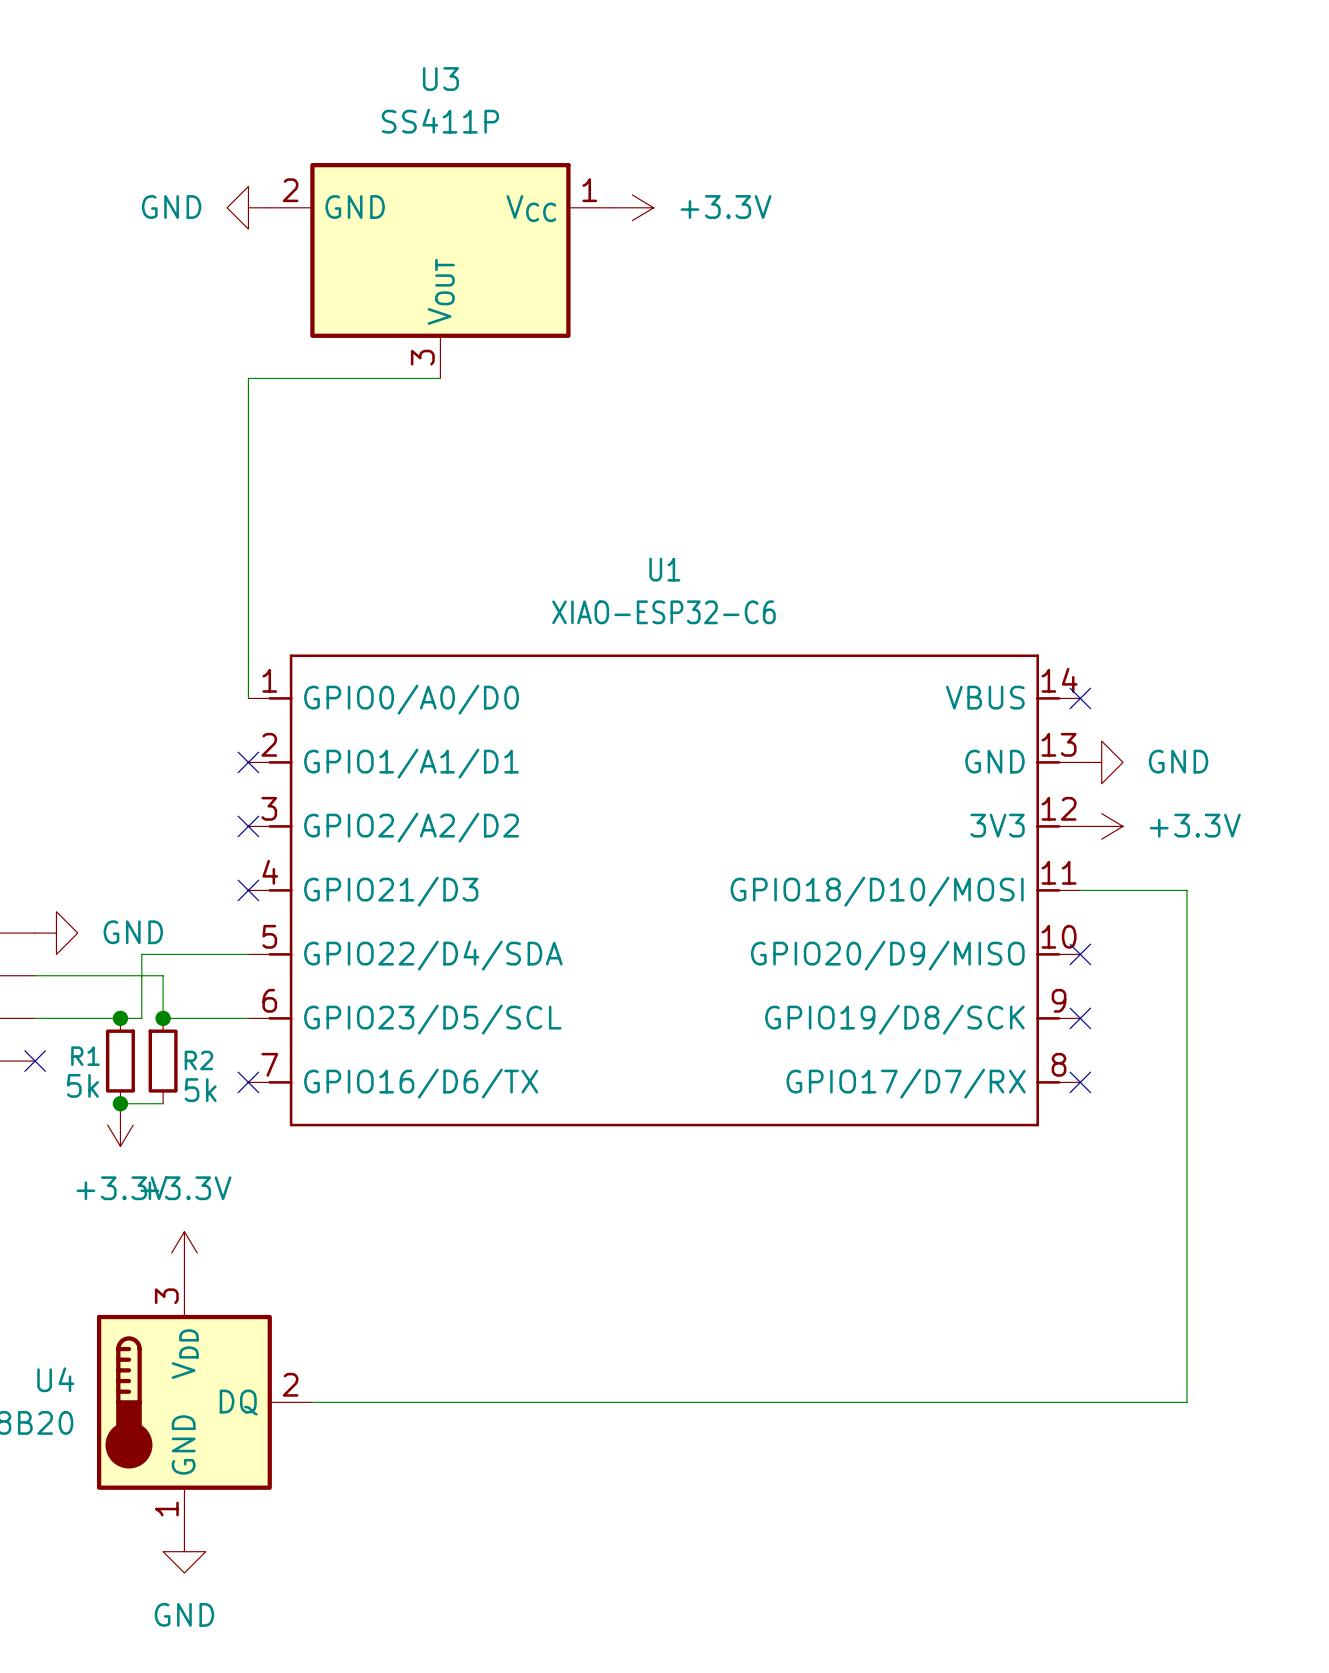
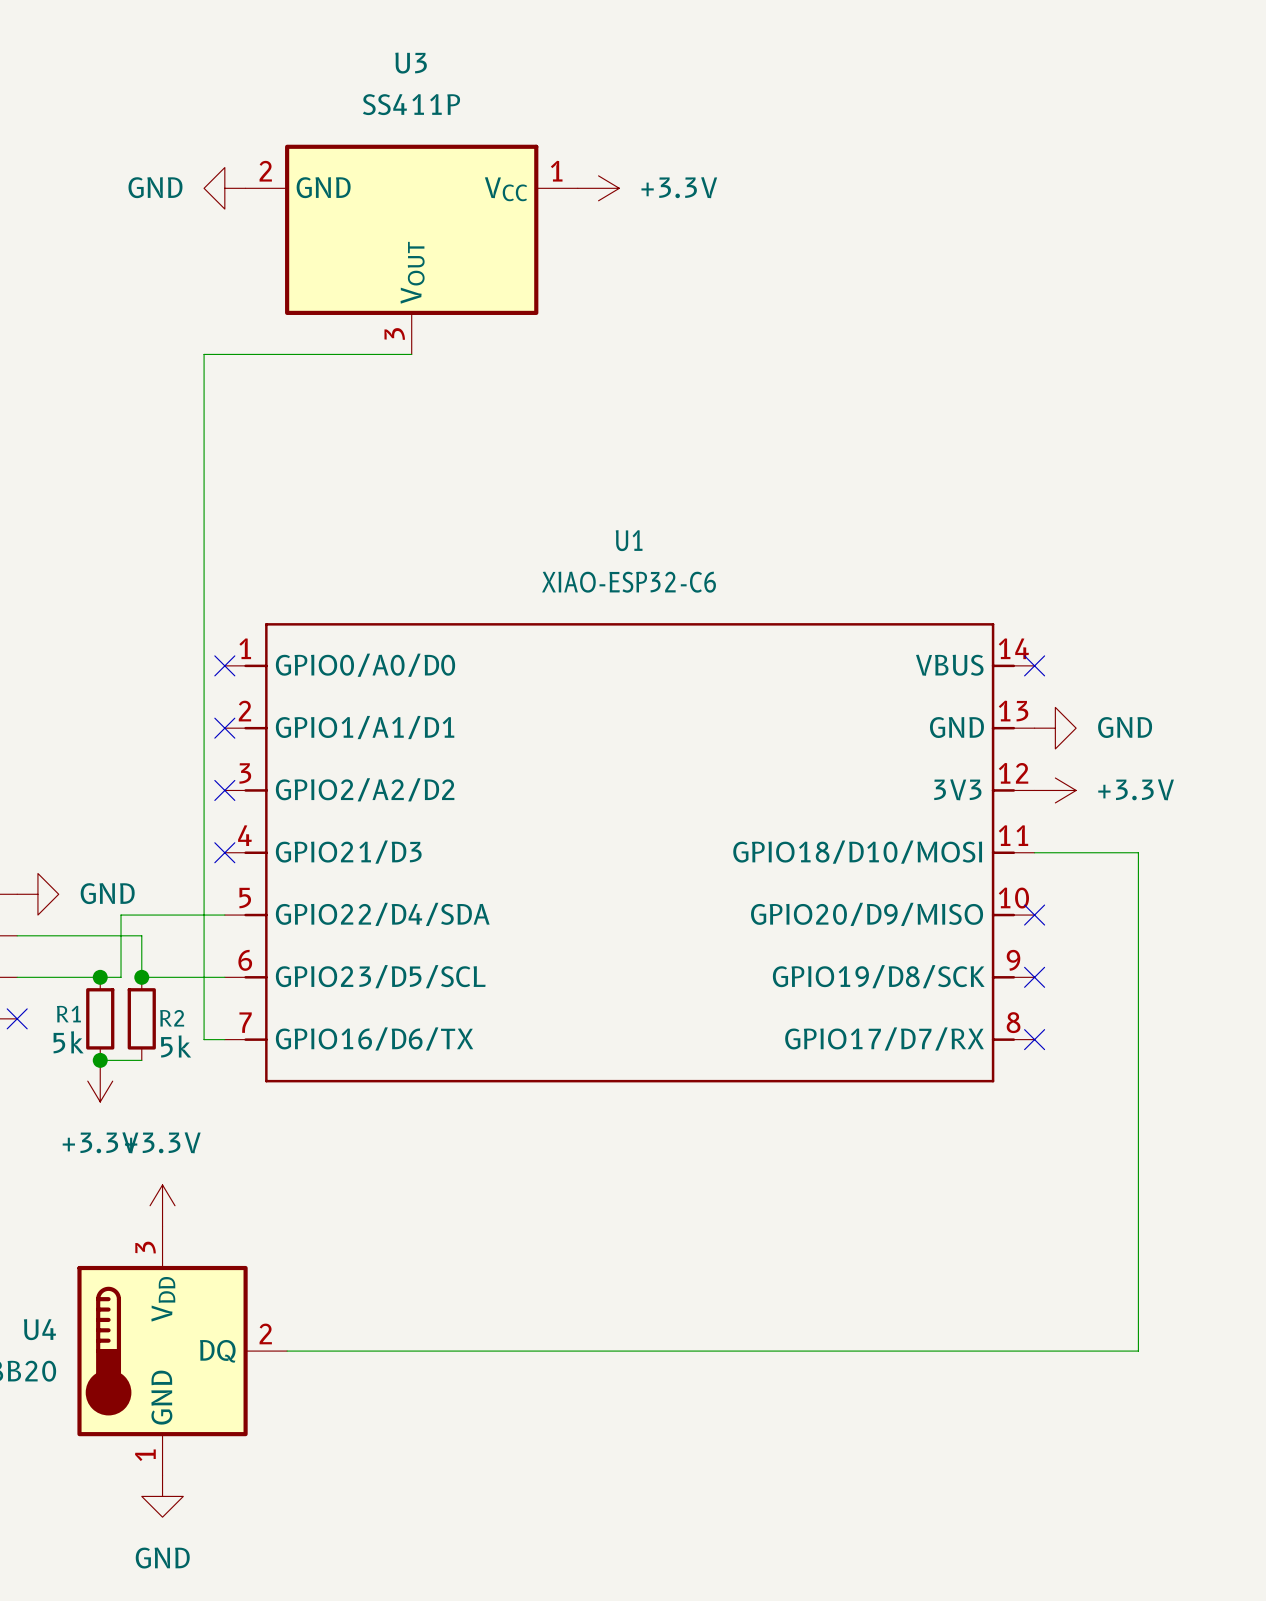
wire: (248, 378) (248, 698) -> (224, 354) (204, 354) (204, 1039) (224, 1039)
no-connect mark: none -> (224, 665)
no-connect mark: (248, 1082) -> none

